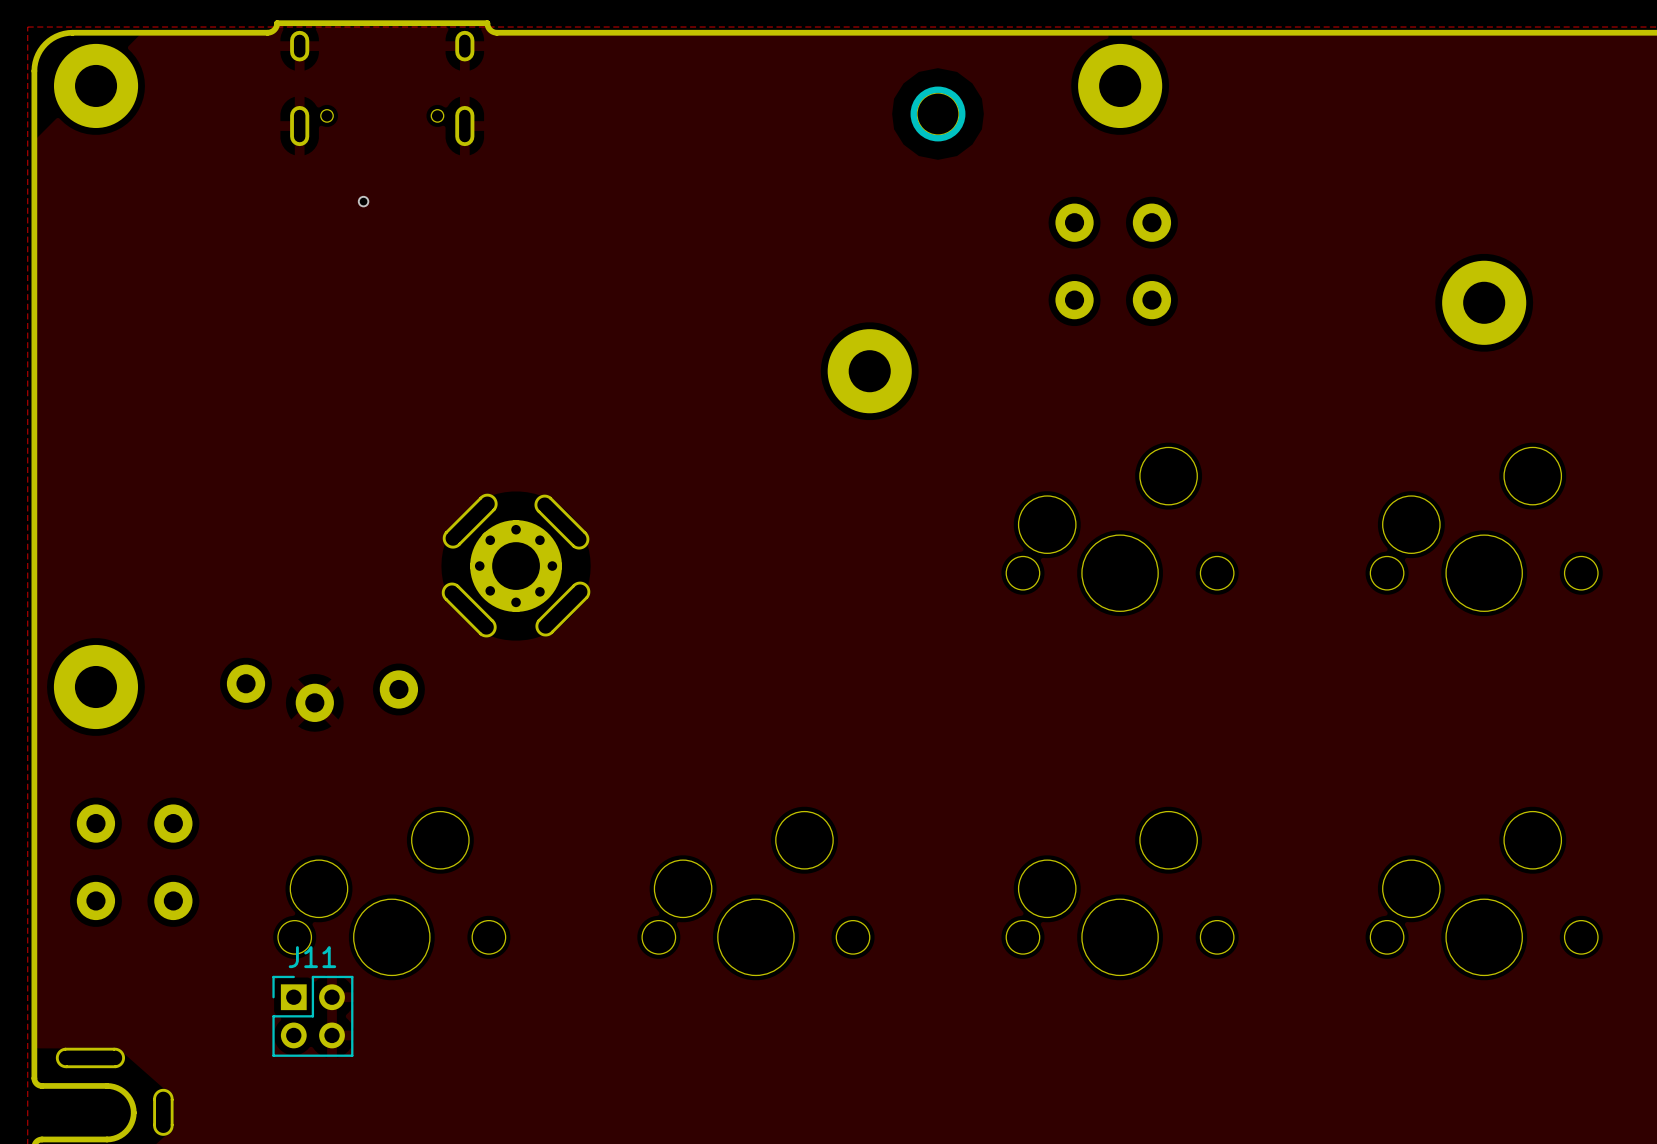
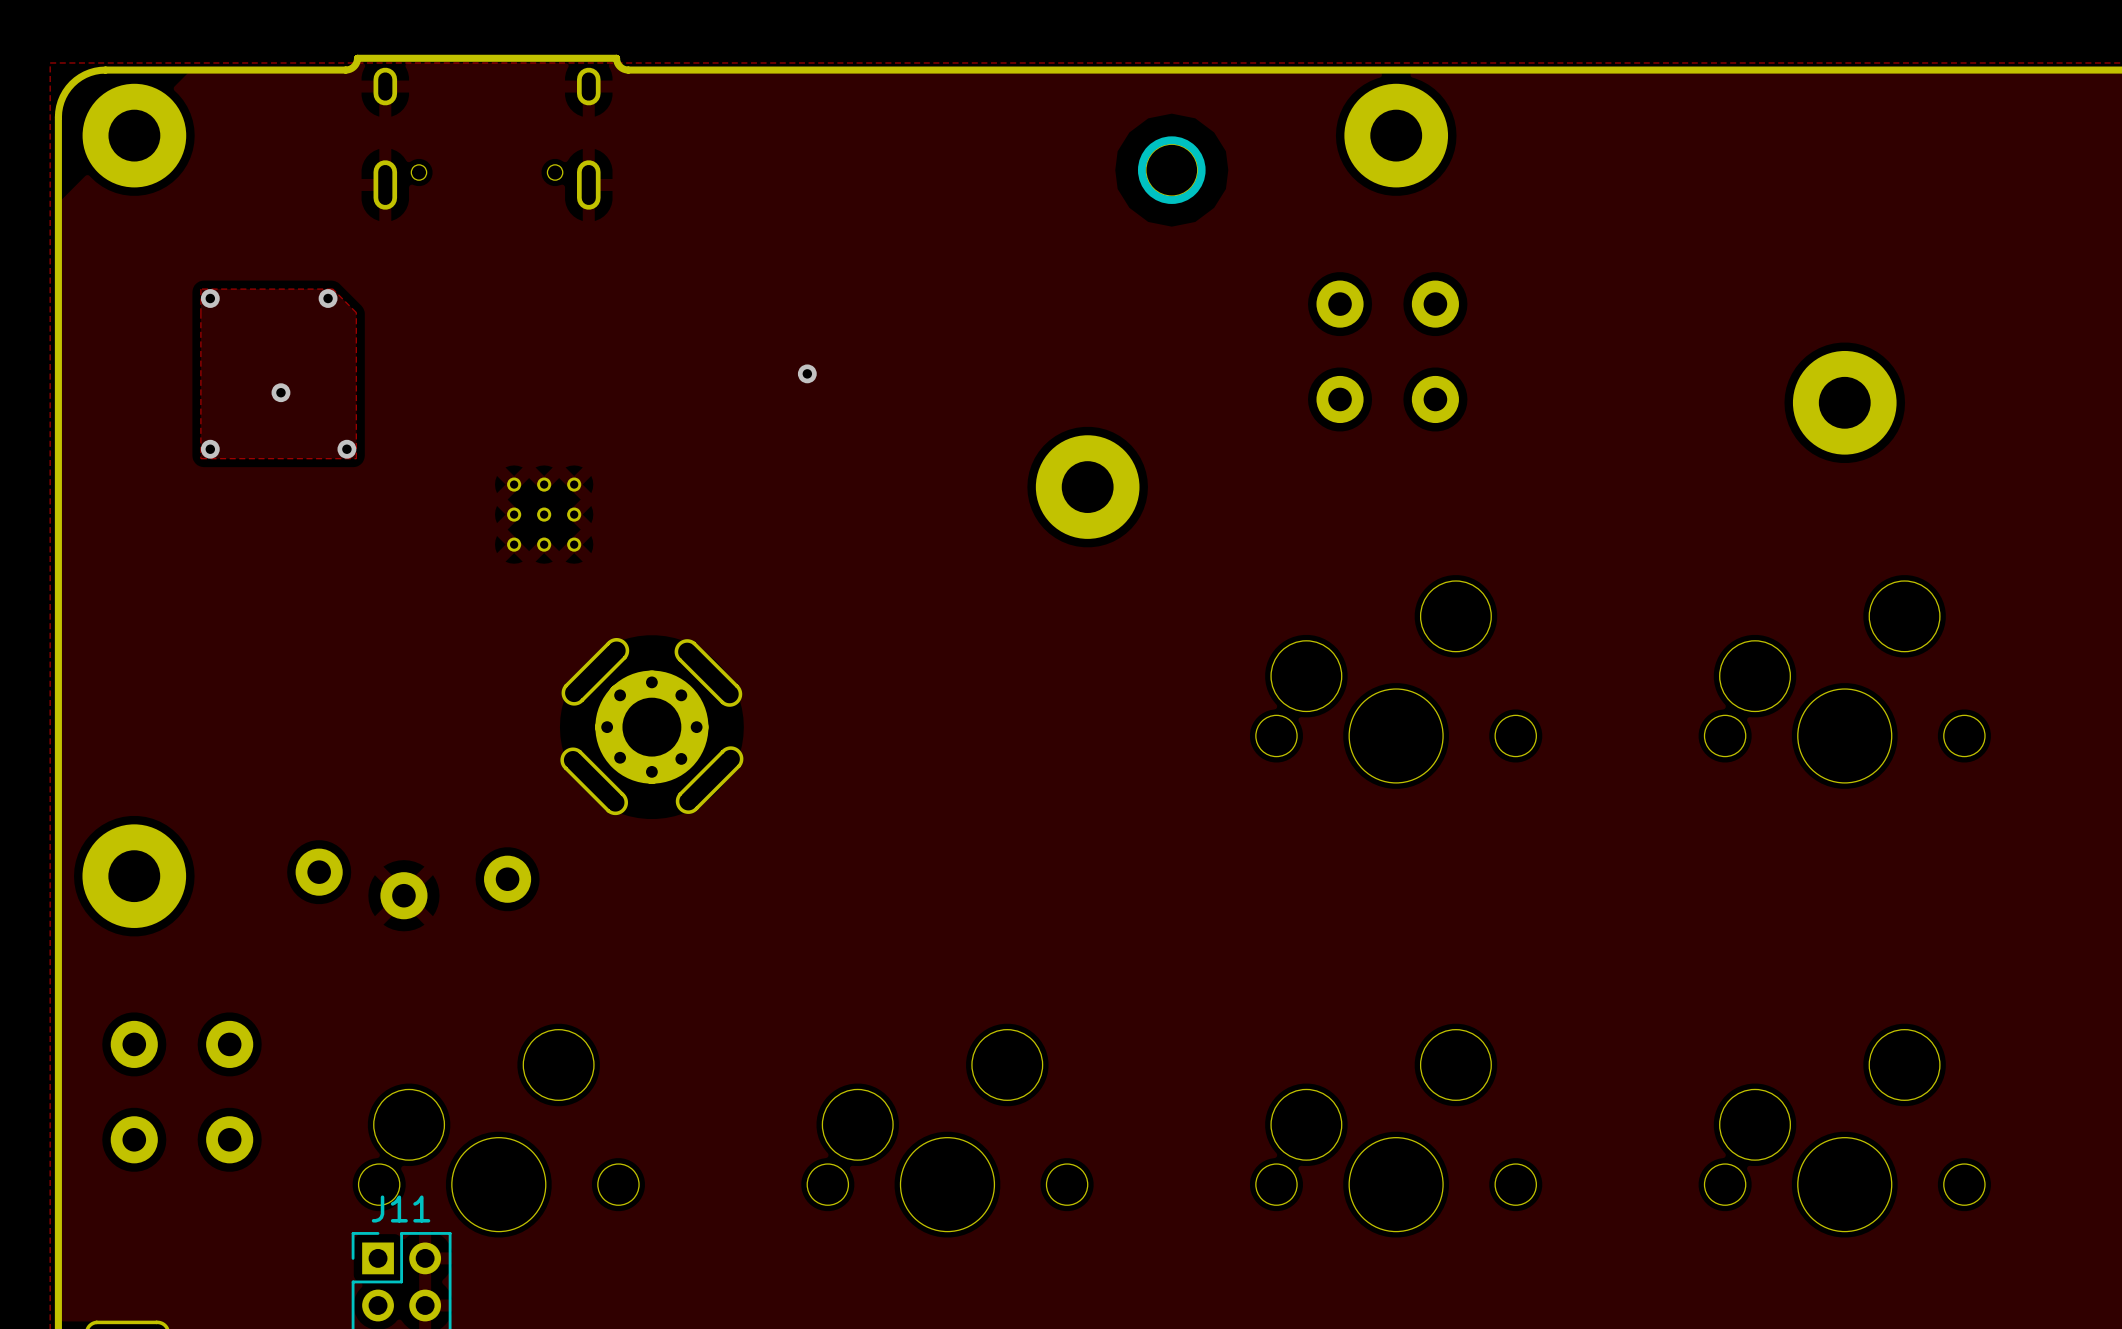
via: (363, 201) -> none
zone outline: none -> (200, 289) (200, 458) (356, 458) (356, 312) (332, 289) (200, 289)
via: none -> (210, 298)
via: none -> (328, 298)
via: none -> (807, 373)
via: none -> (280, 392)
via: none -> (210, 449)
via: none -> (346, 449)
part: none -> (544, 514)

